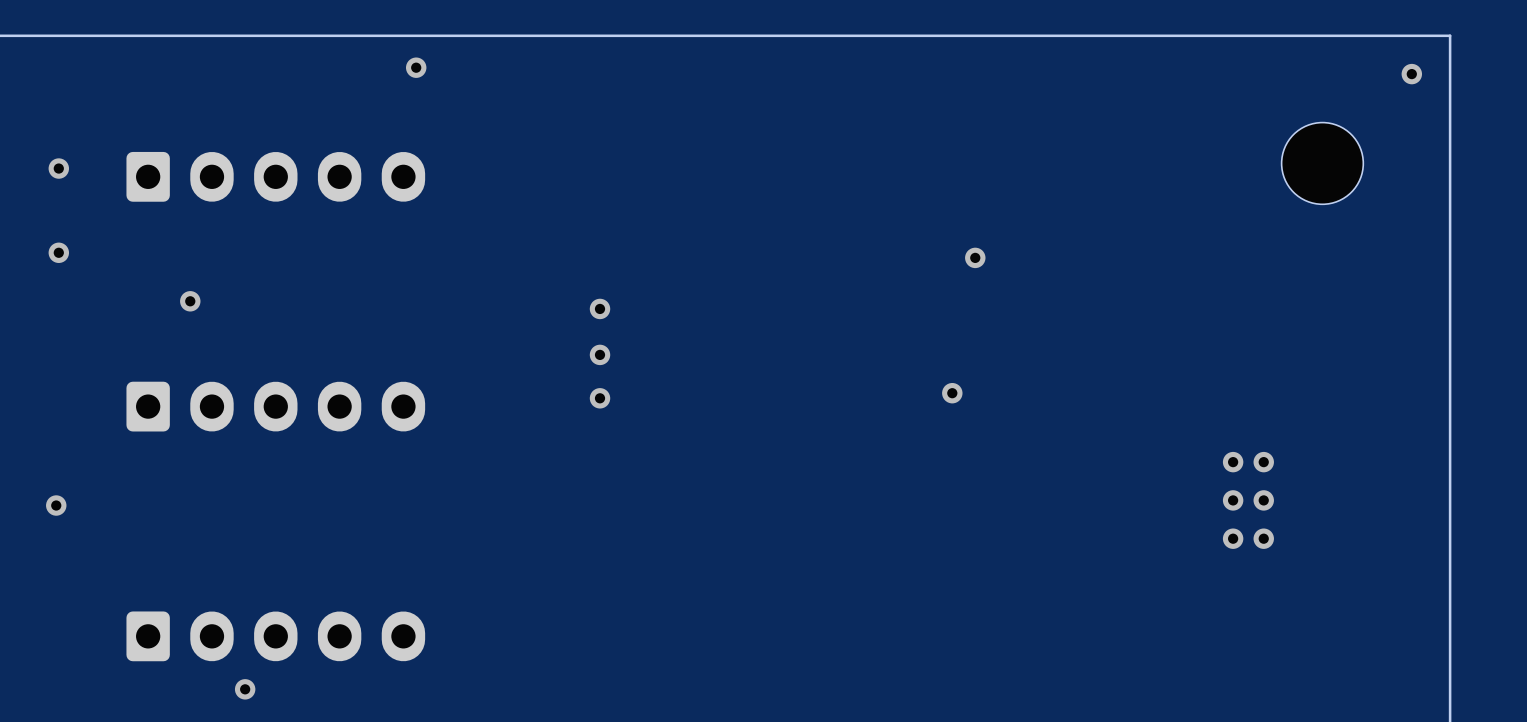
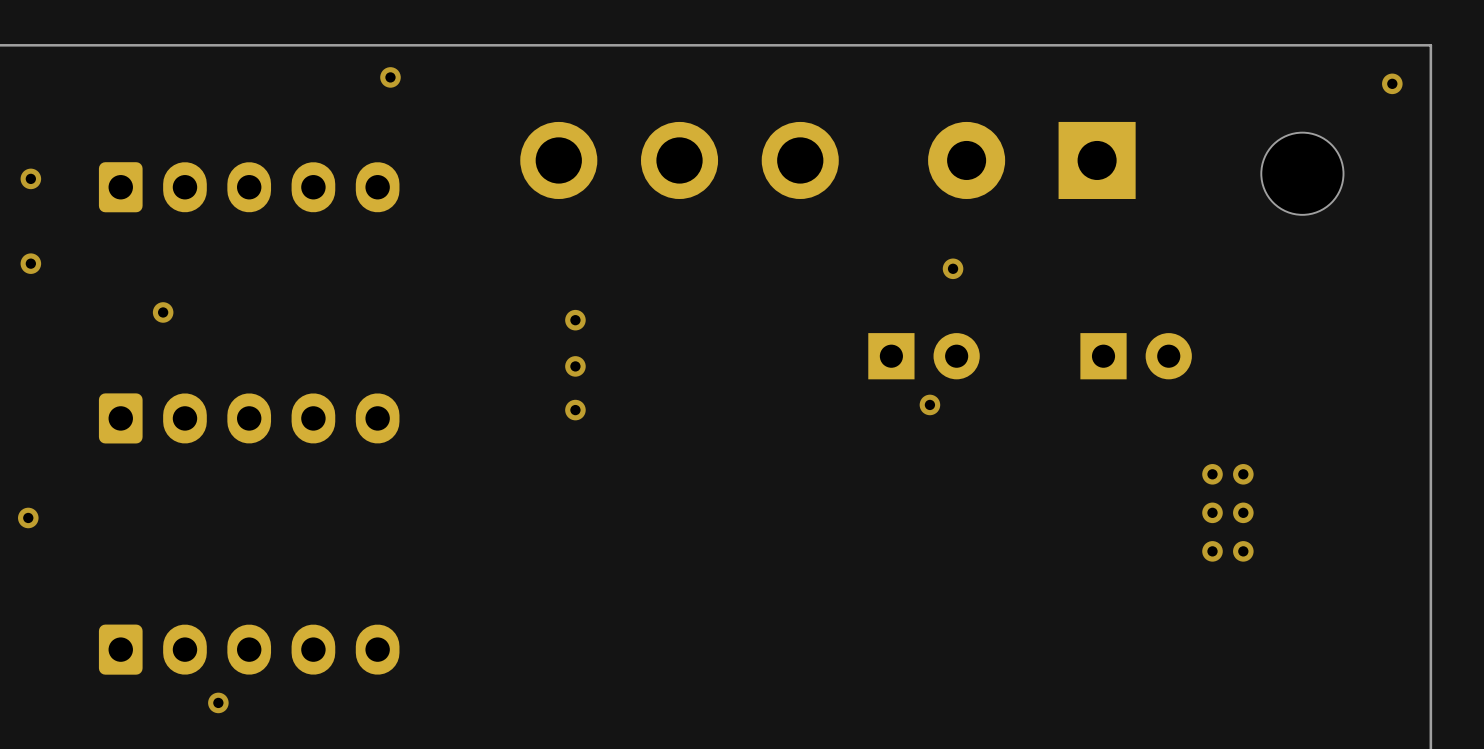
part: none -> (679, 160)
part: none -> (1031, 160)
part: none -> (924, 356)
part: none -> (1136, 356)

